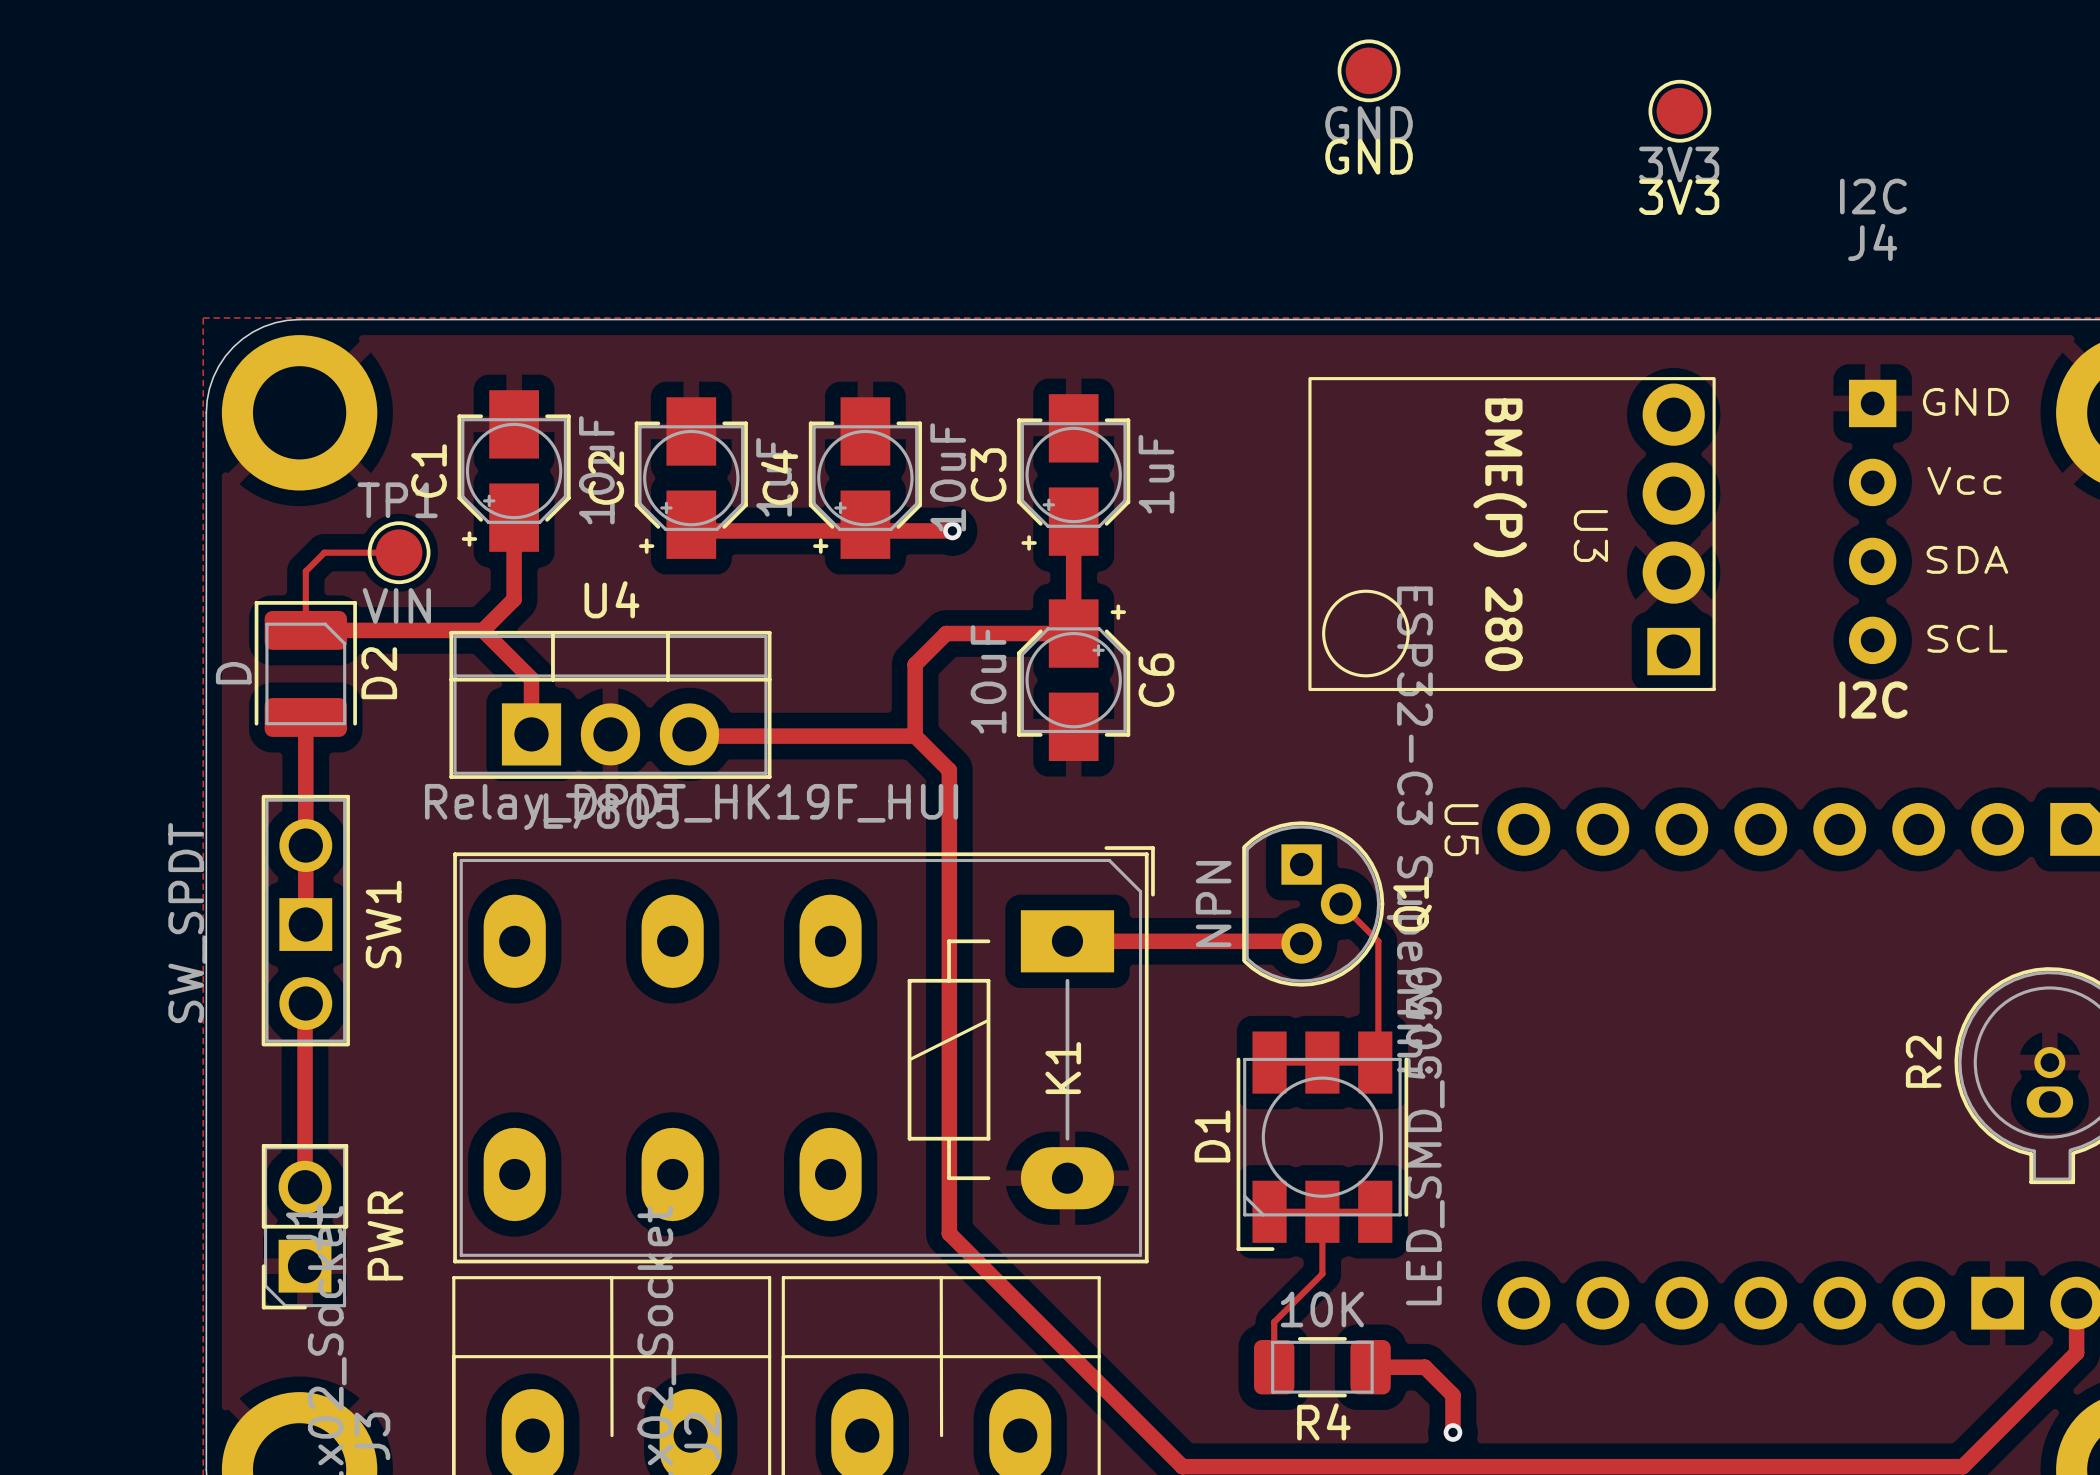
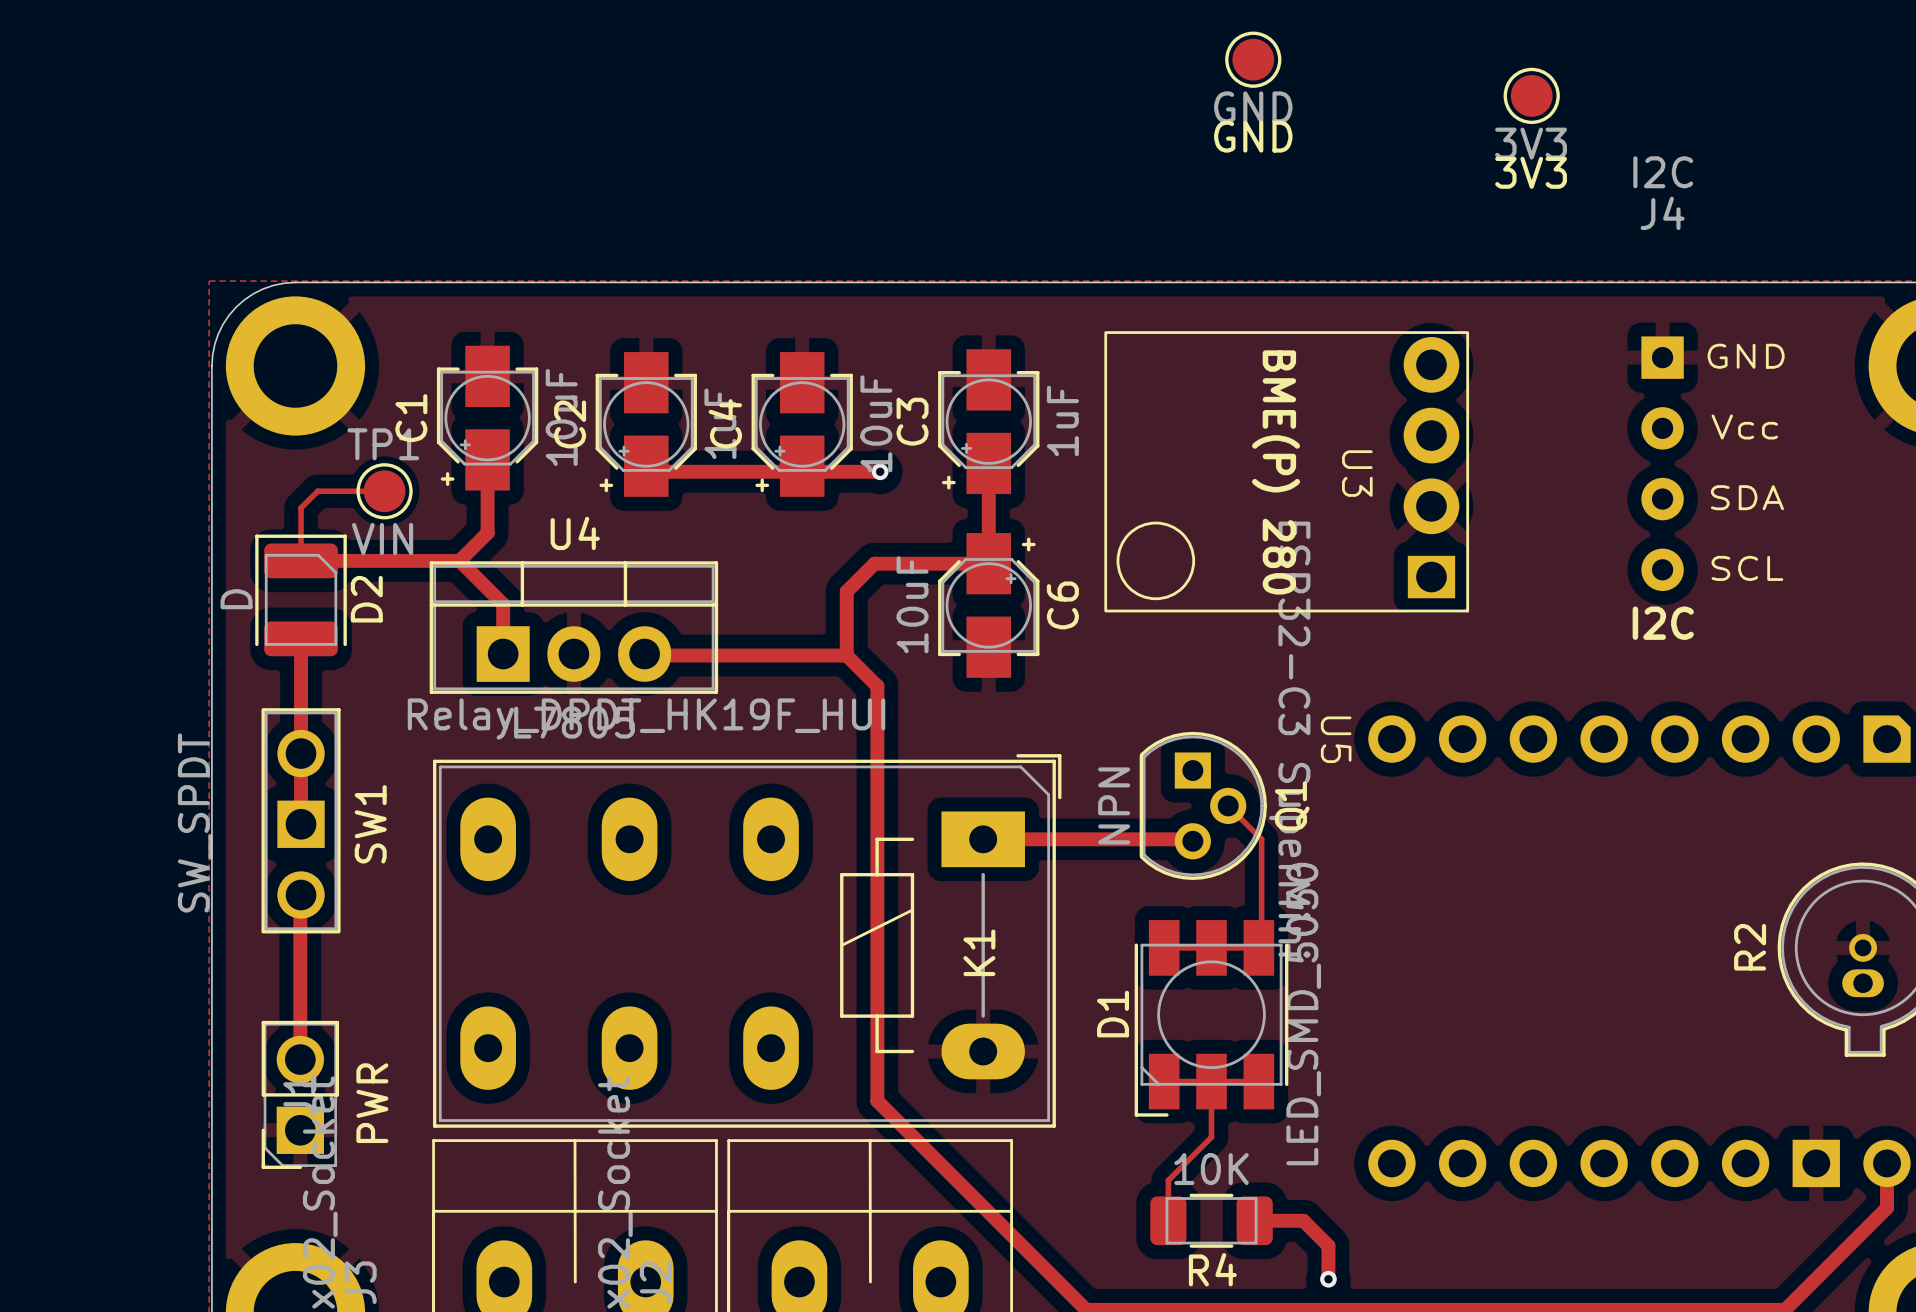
J4 position: (1872, 521) -> (1662, 463)
U3 position: (1512, 534) -> (1286, 471)

